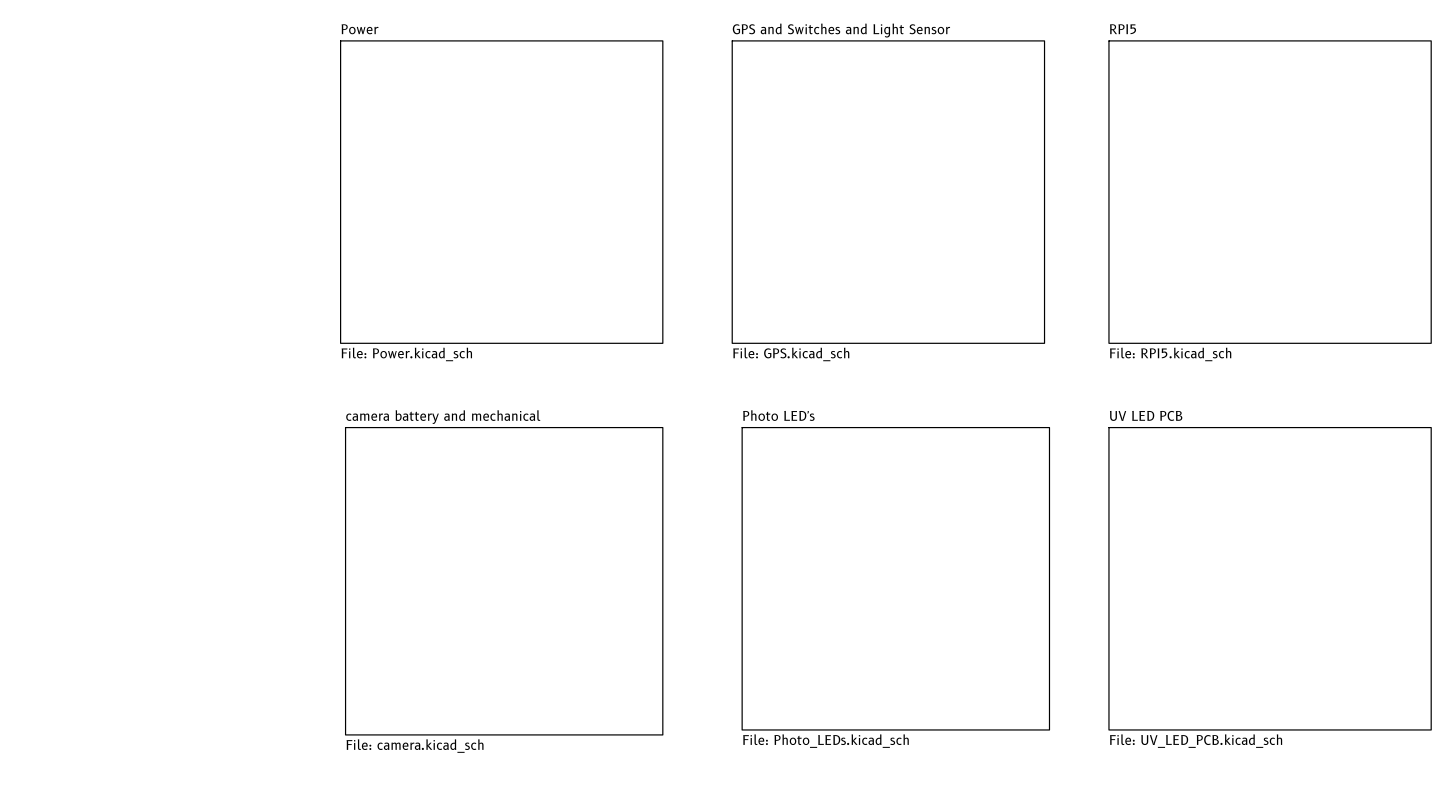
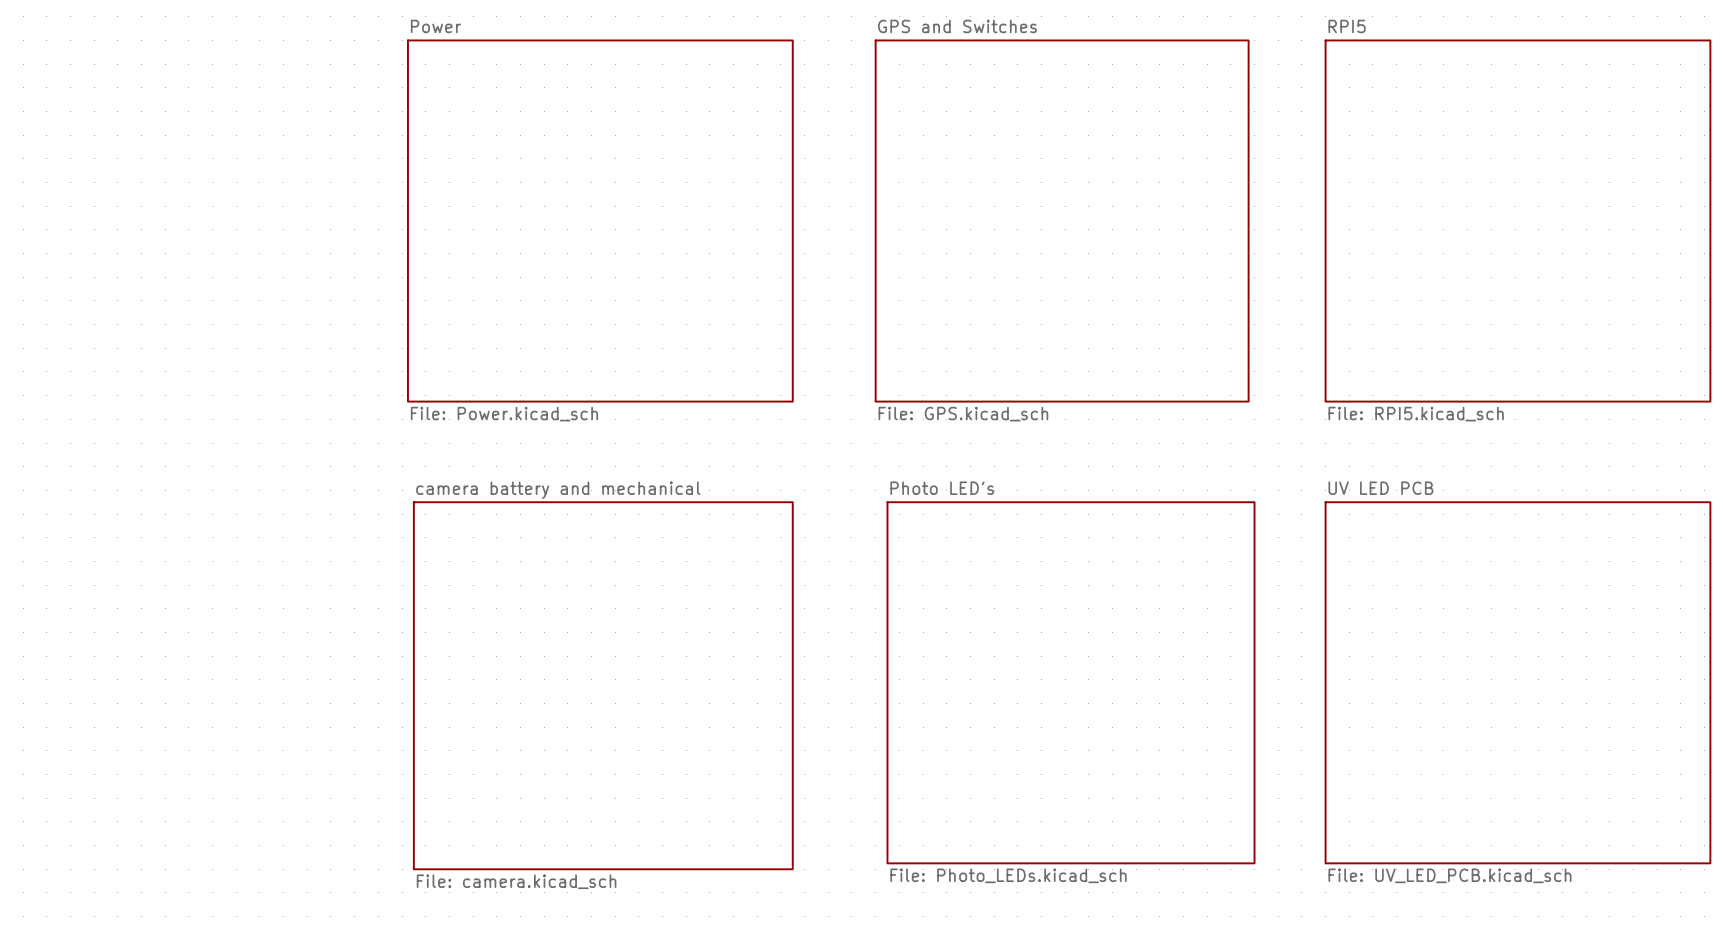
sheet GPS and Switches name: GPS and Switches and Light Sensor (841, 30) -> GPS and Switches (957, 26)

